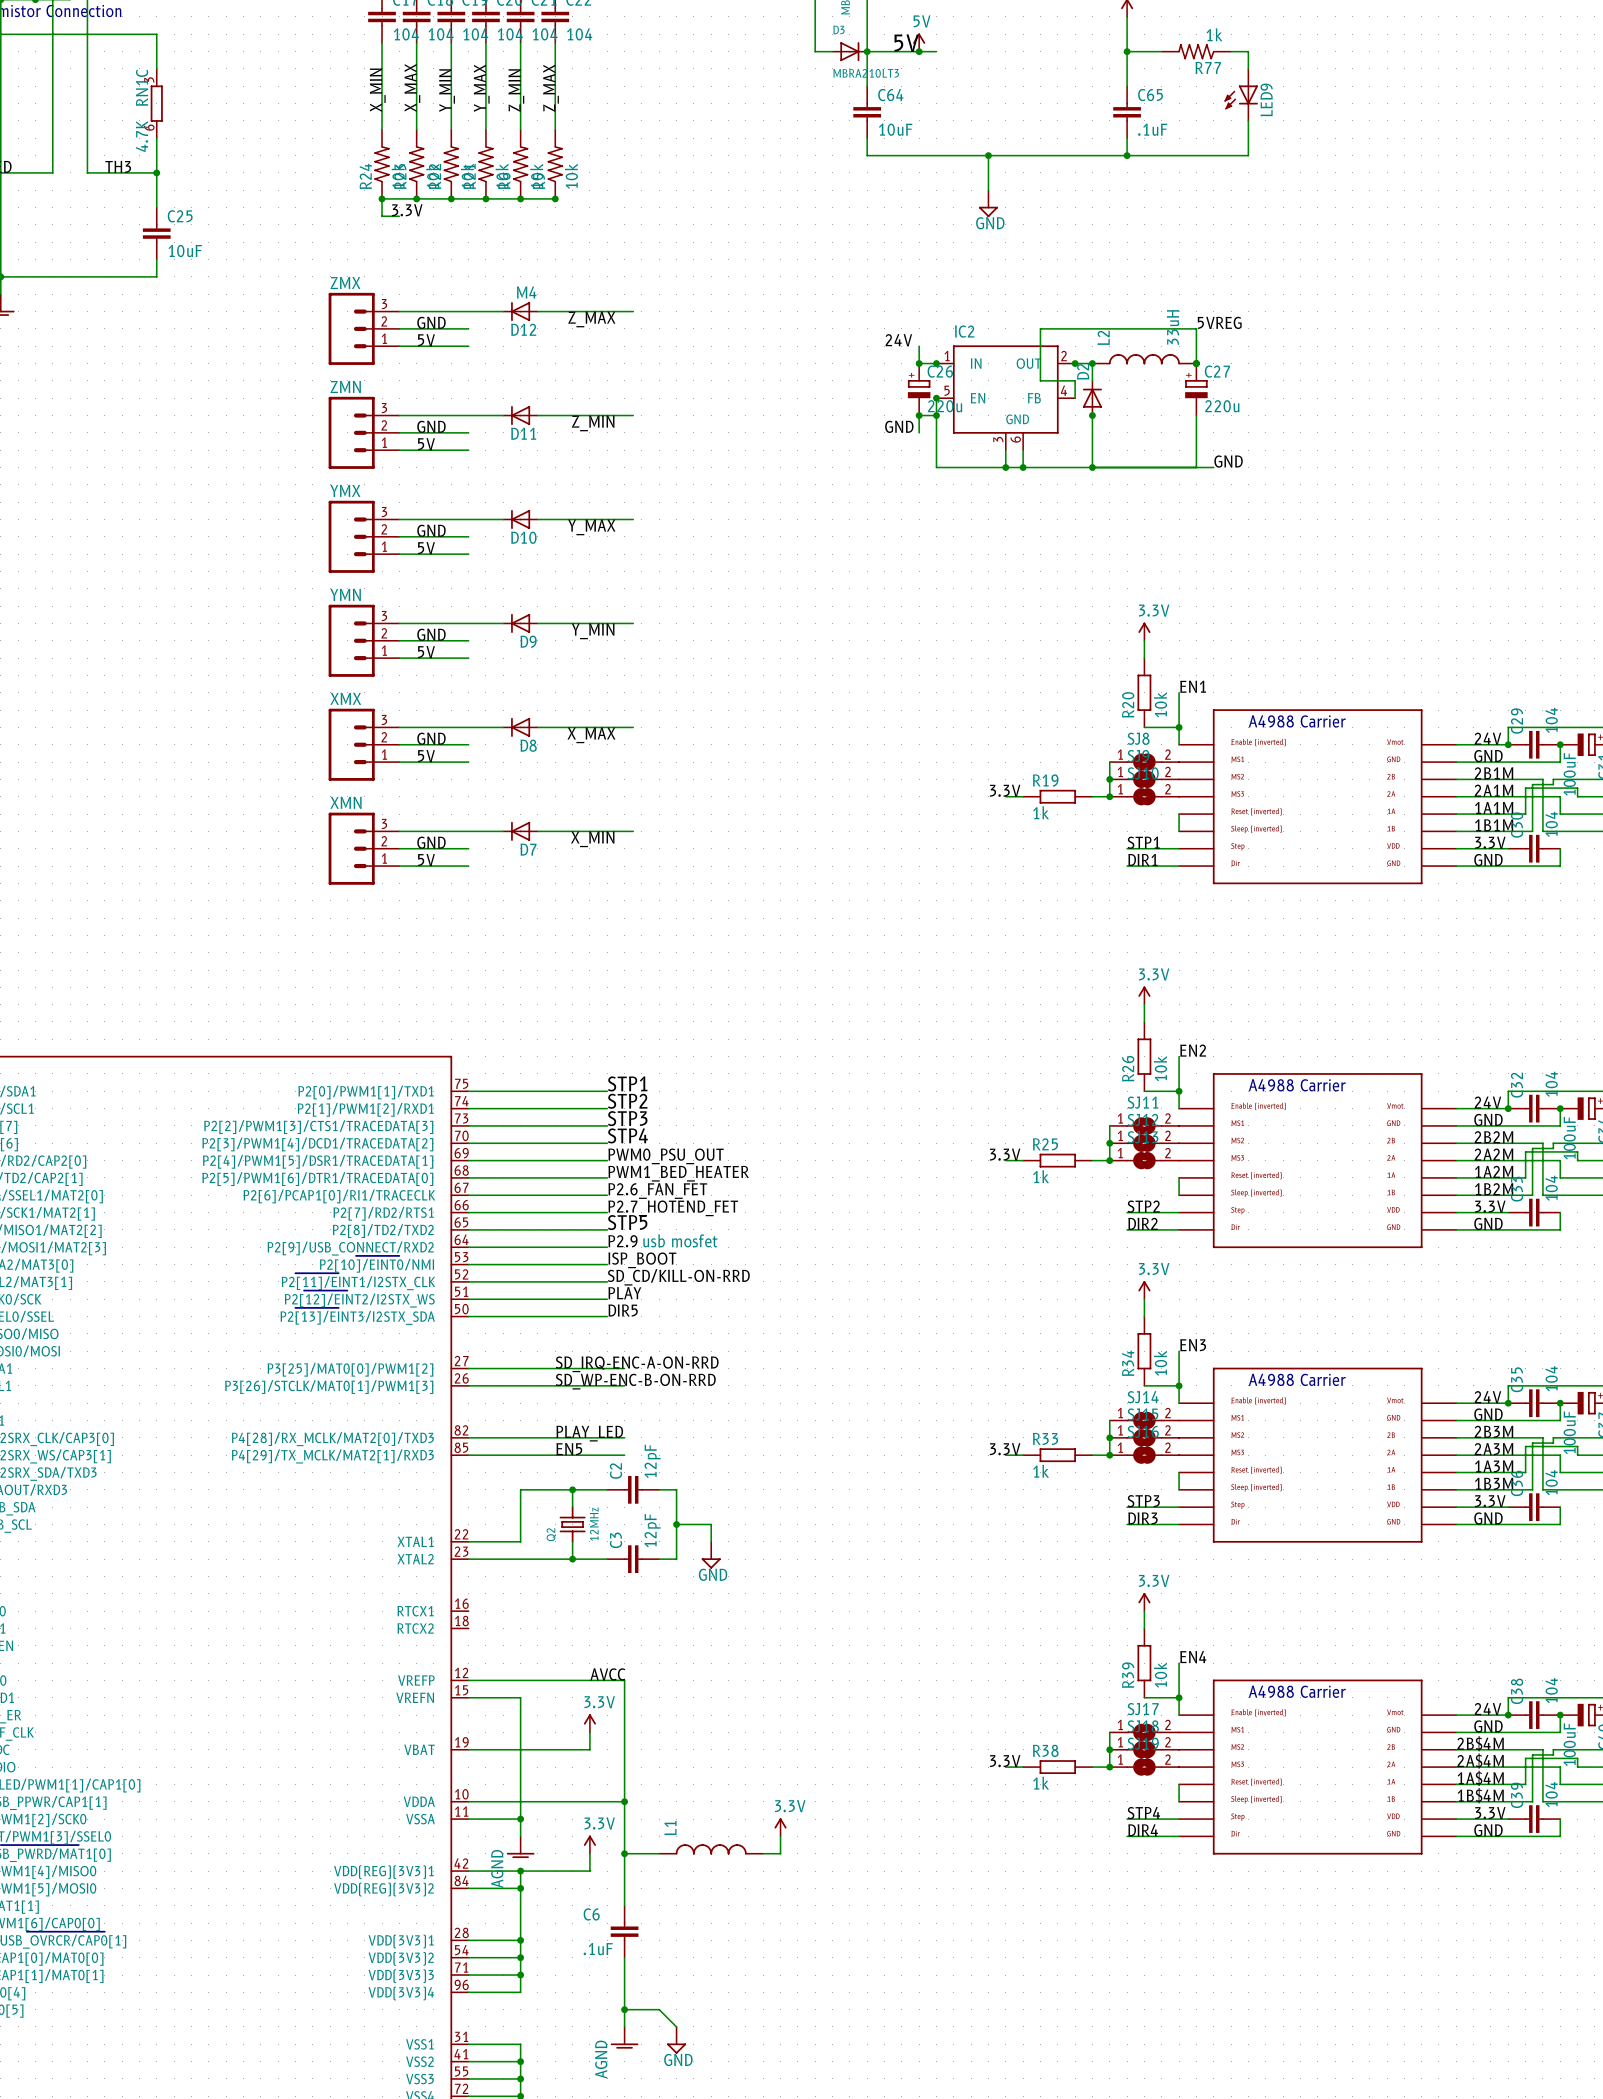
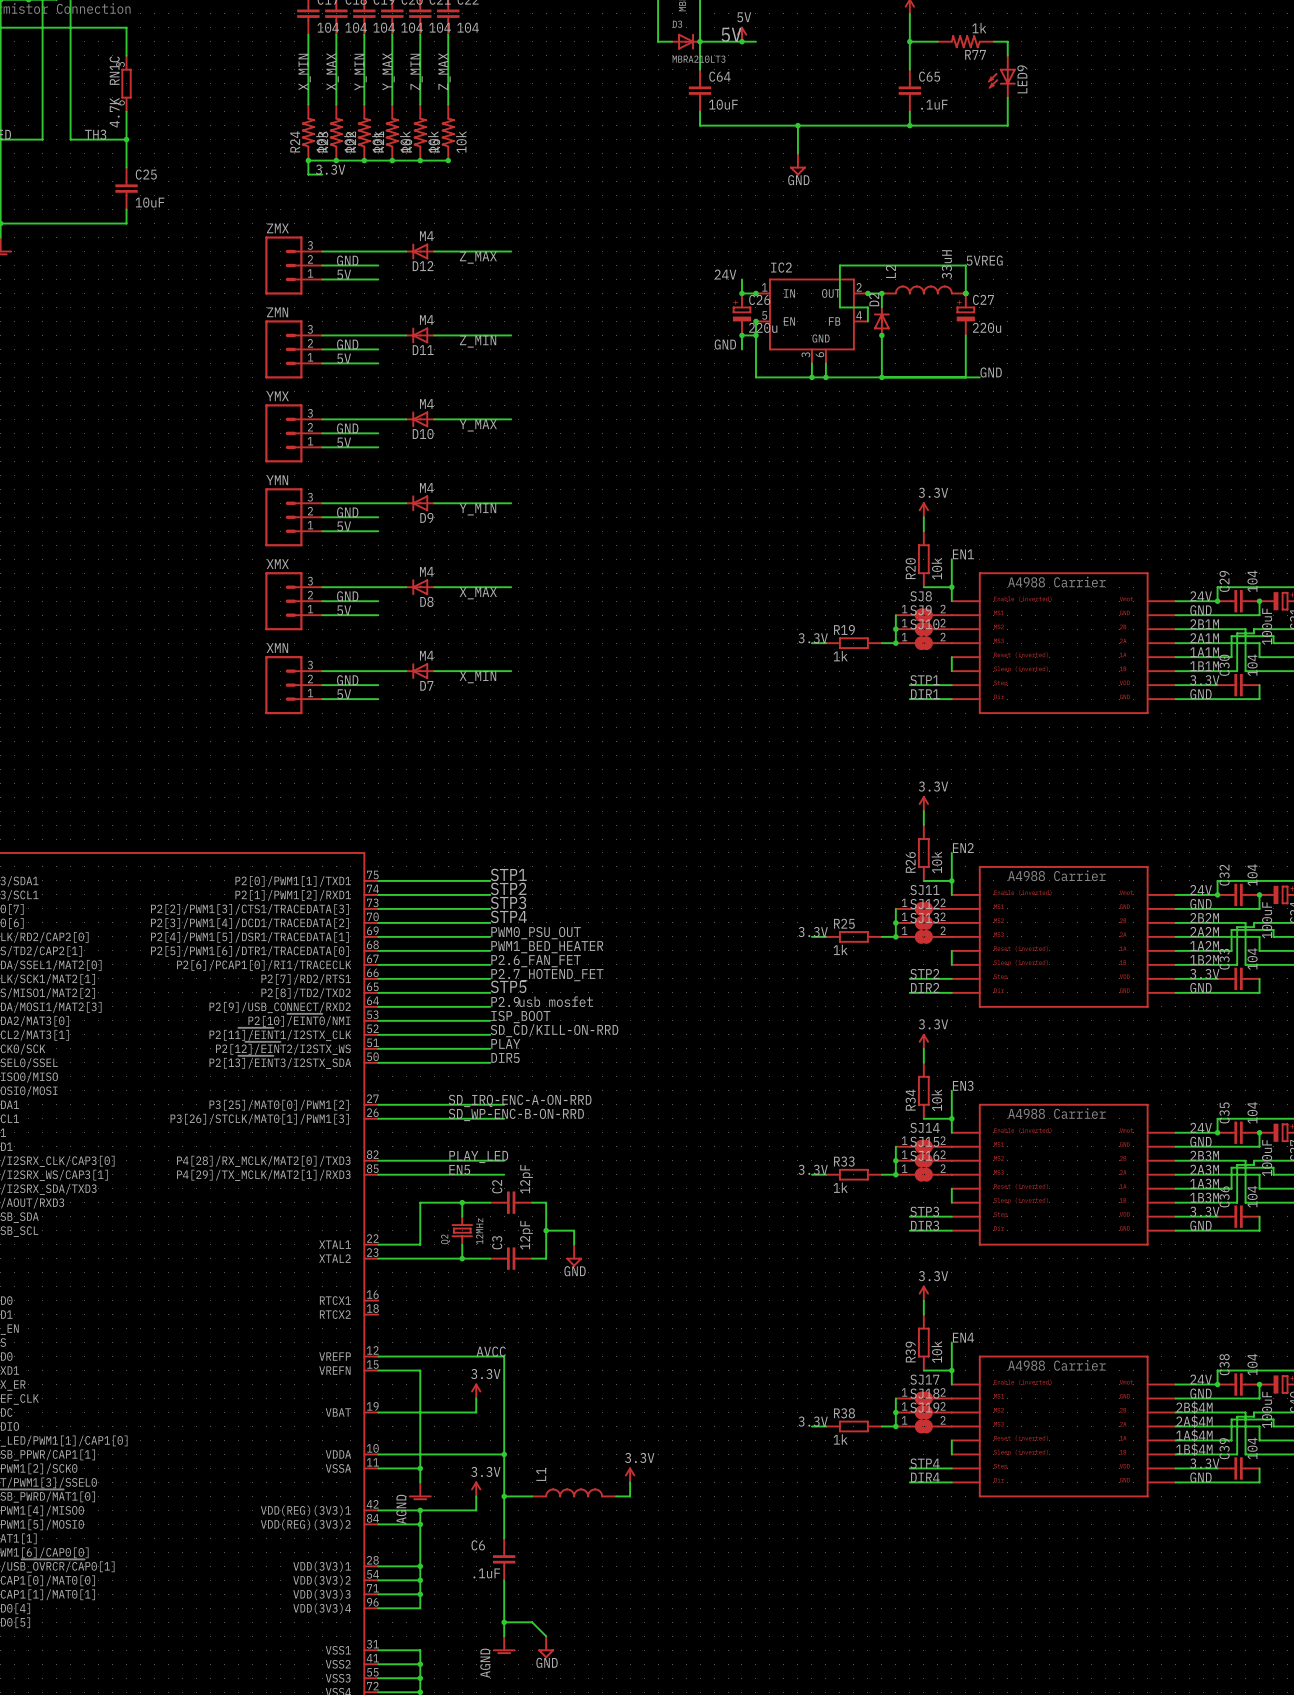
D11 value: none -> M4 (426, 320)
D10 value: none -> M4 (426, 403)
D9 value: none -> M4 (426, 487)
D8 value: none -> M4 (426, 571)
D7 value: none -> M4 (426, 655)

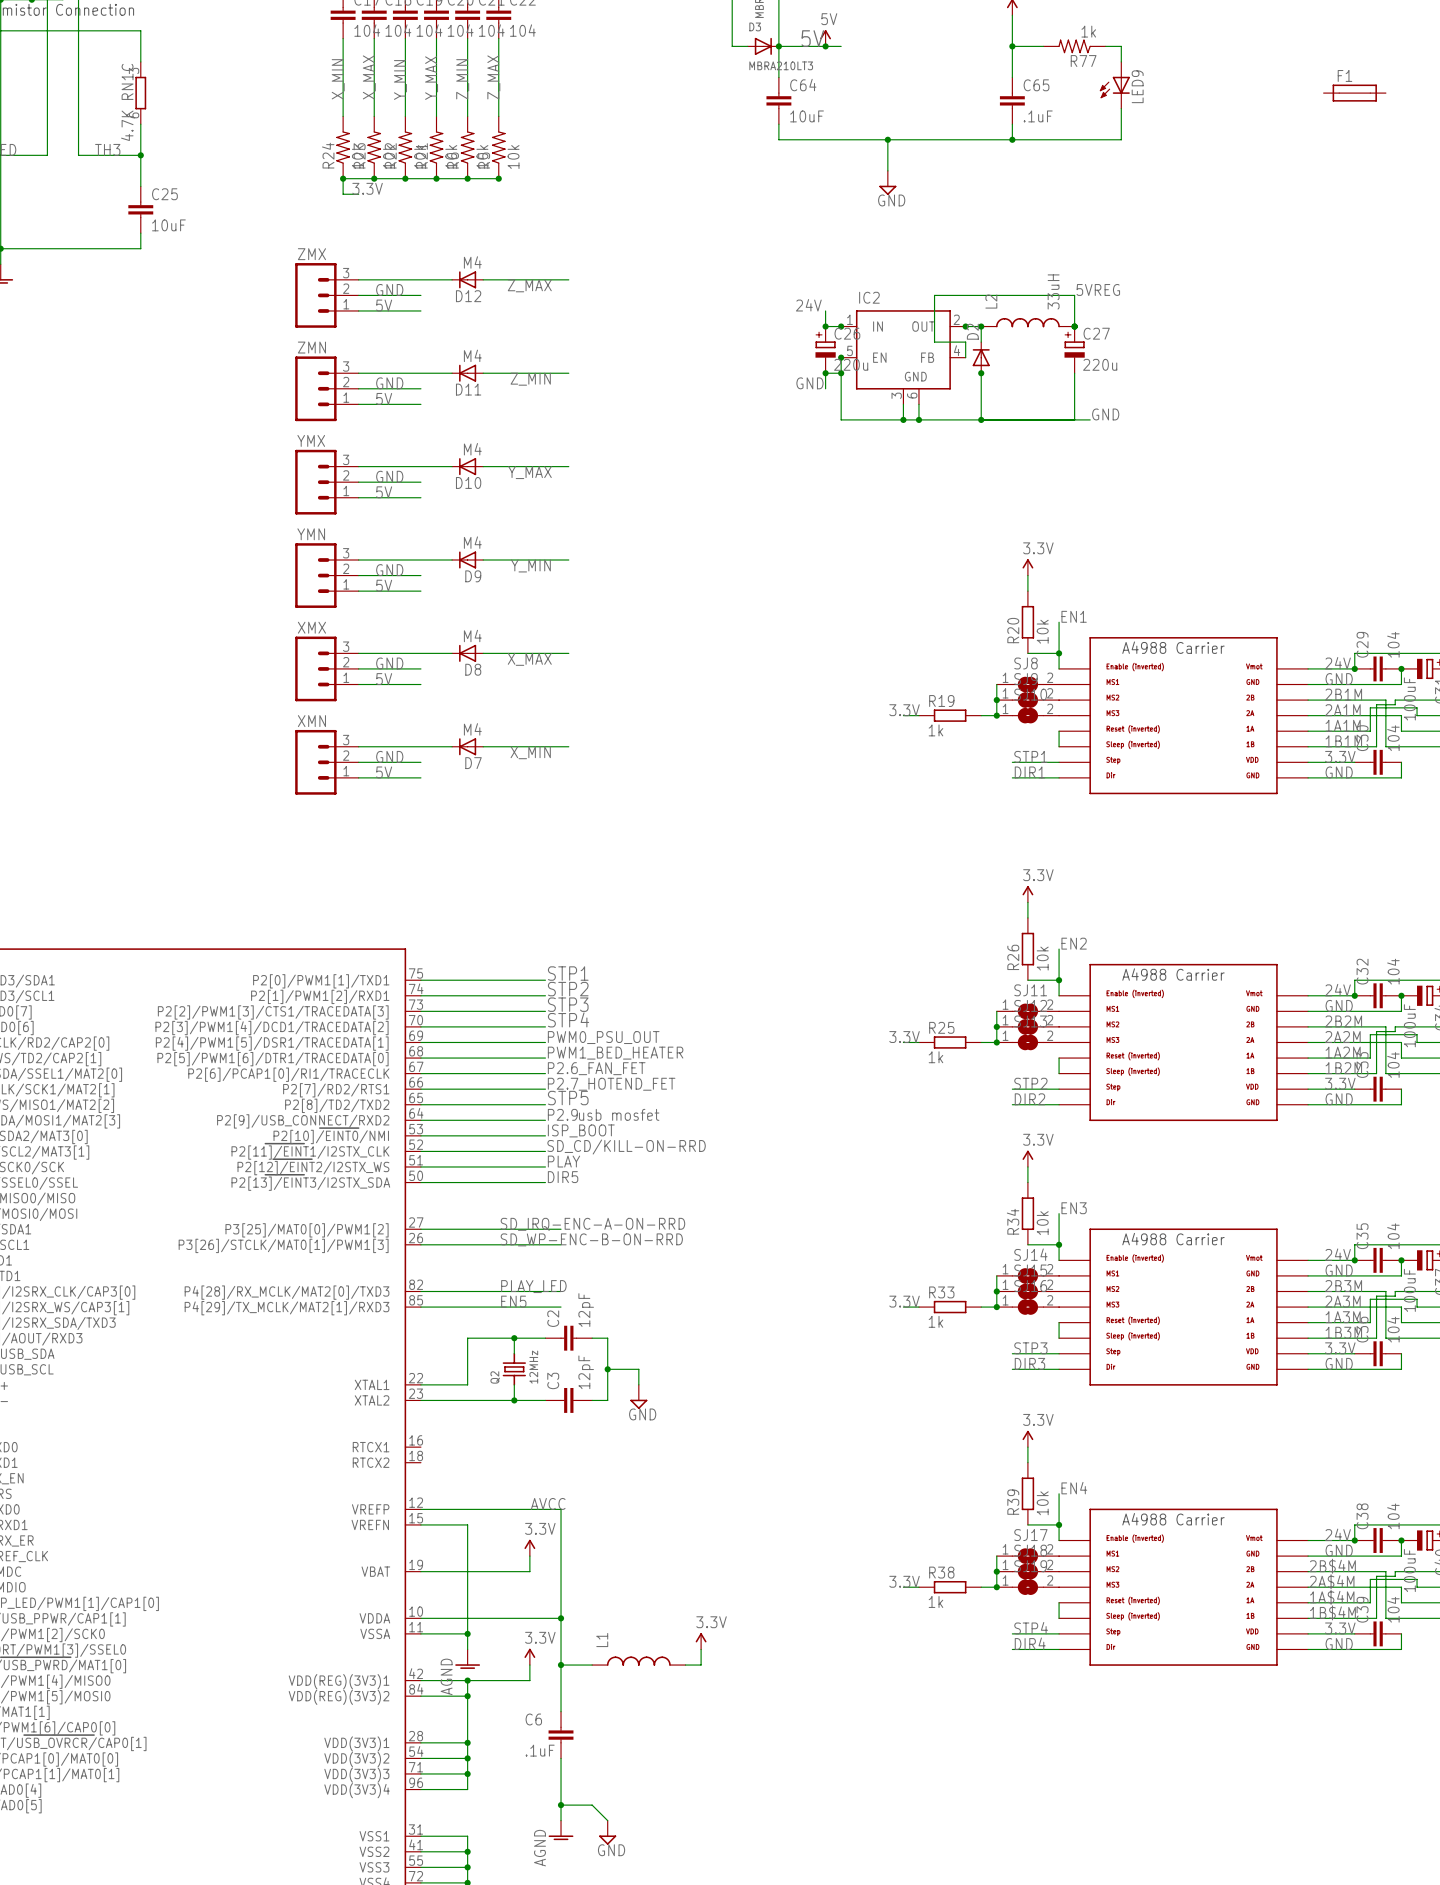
F1: none -> (1354, 93)

